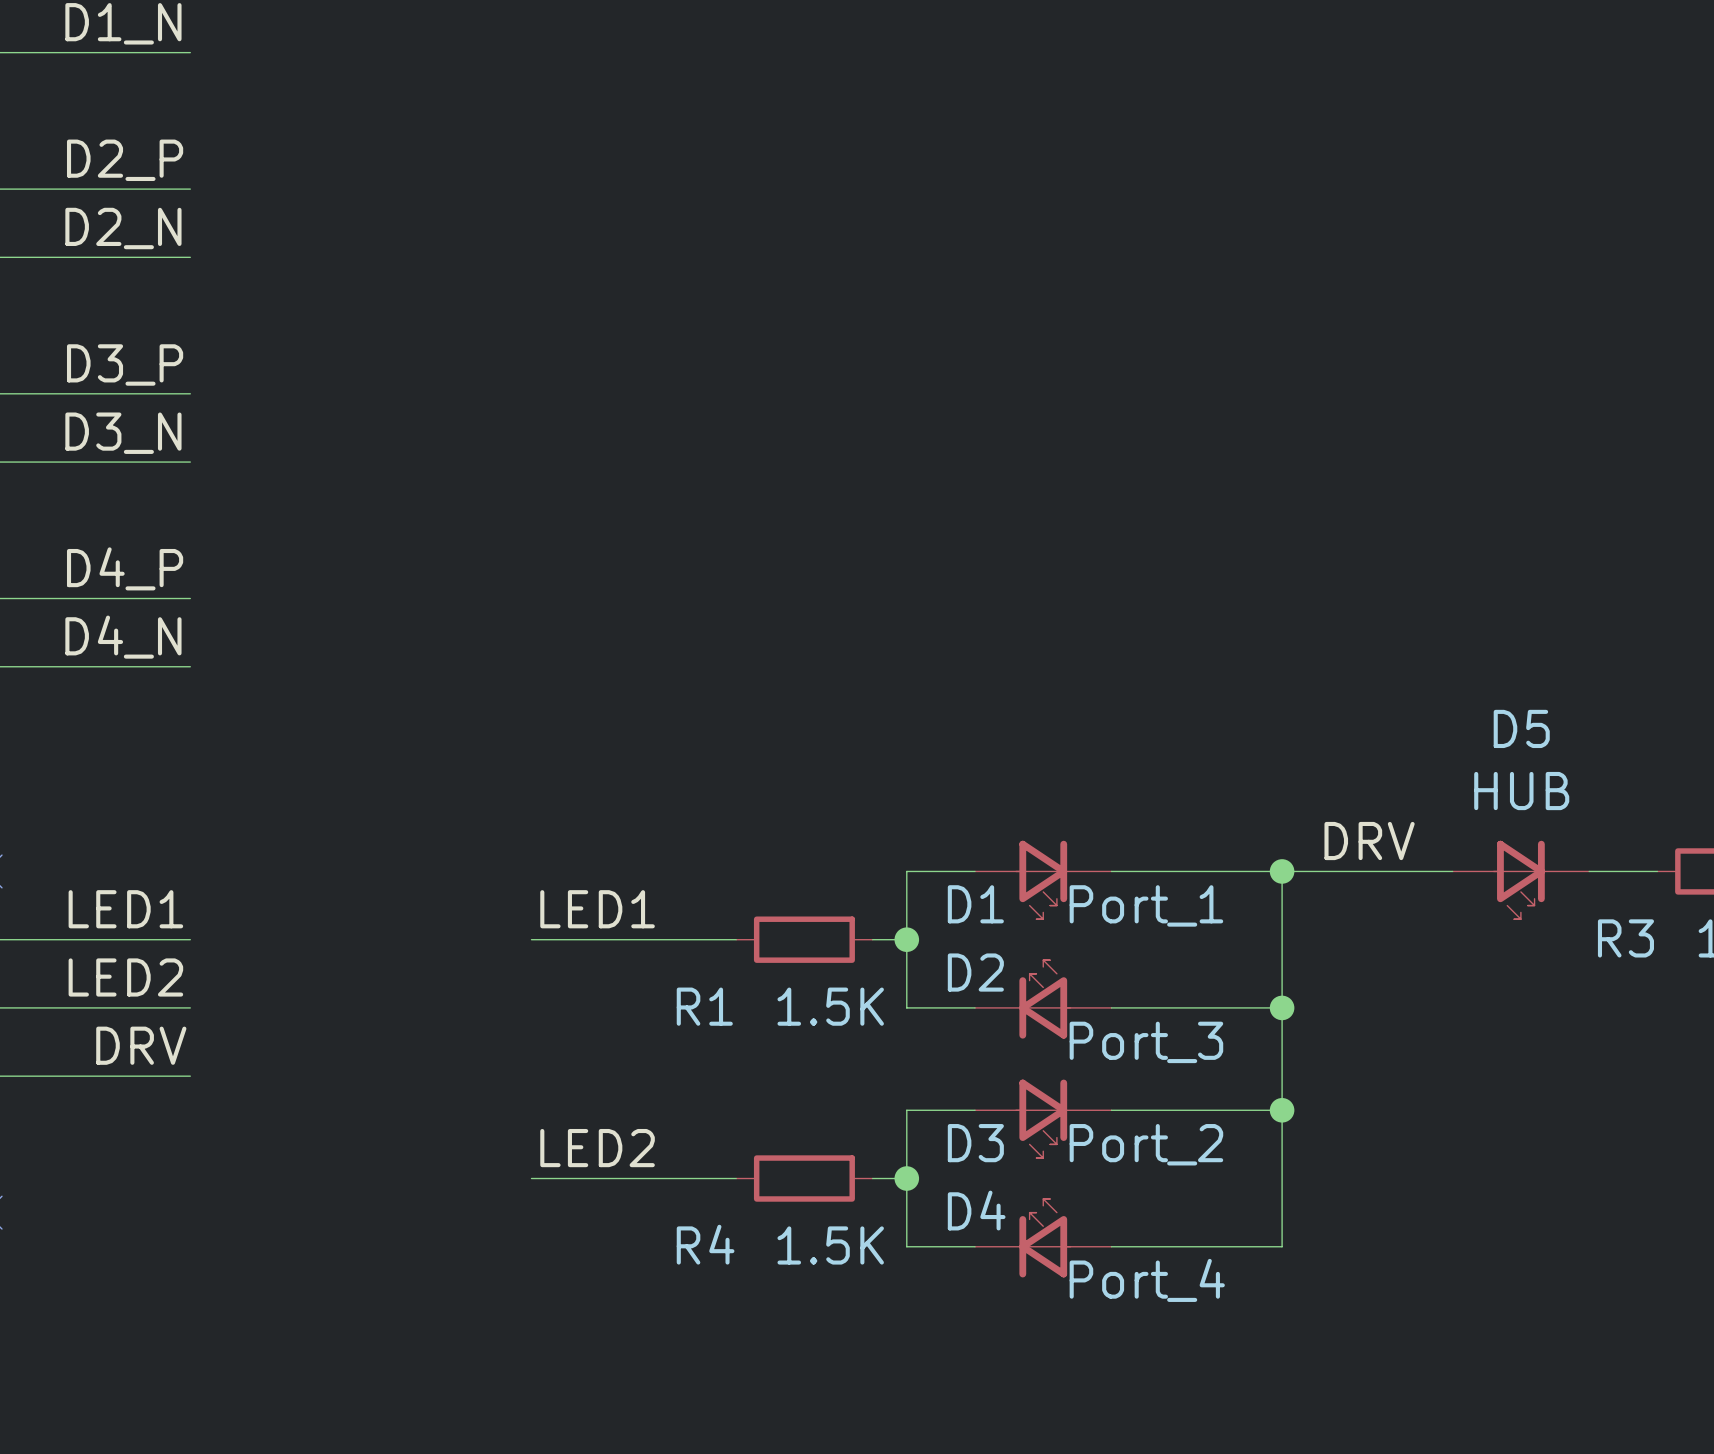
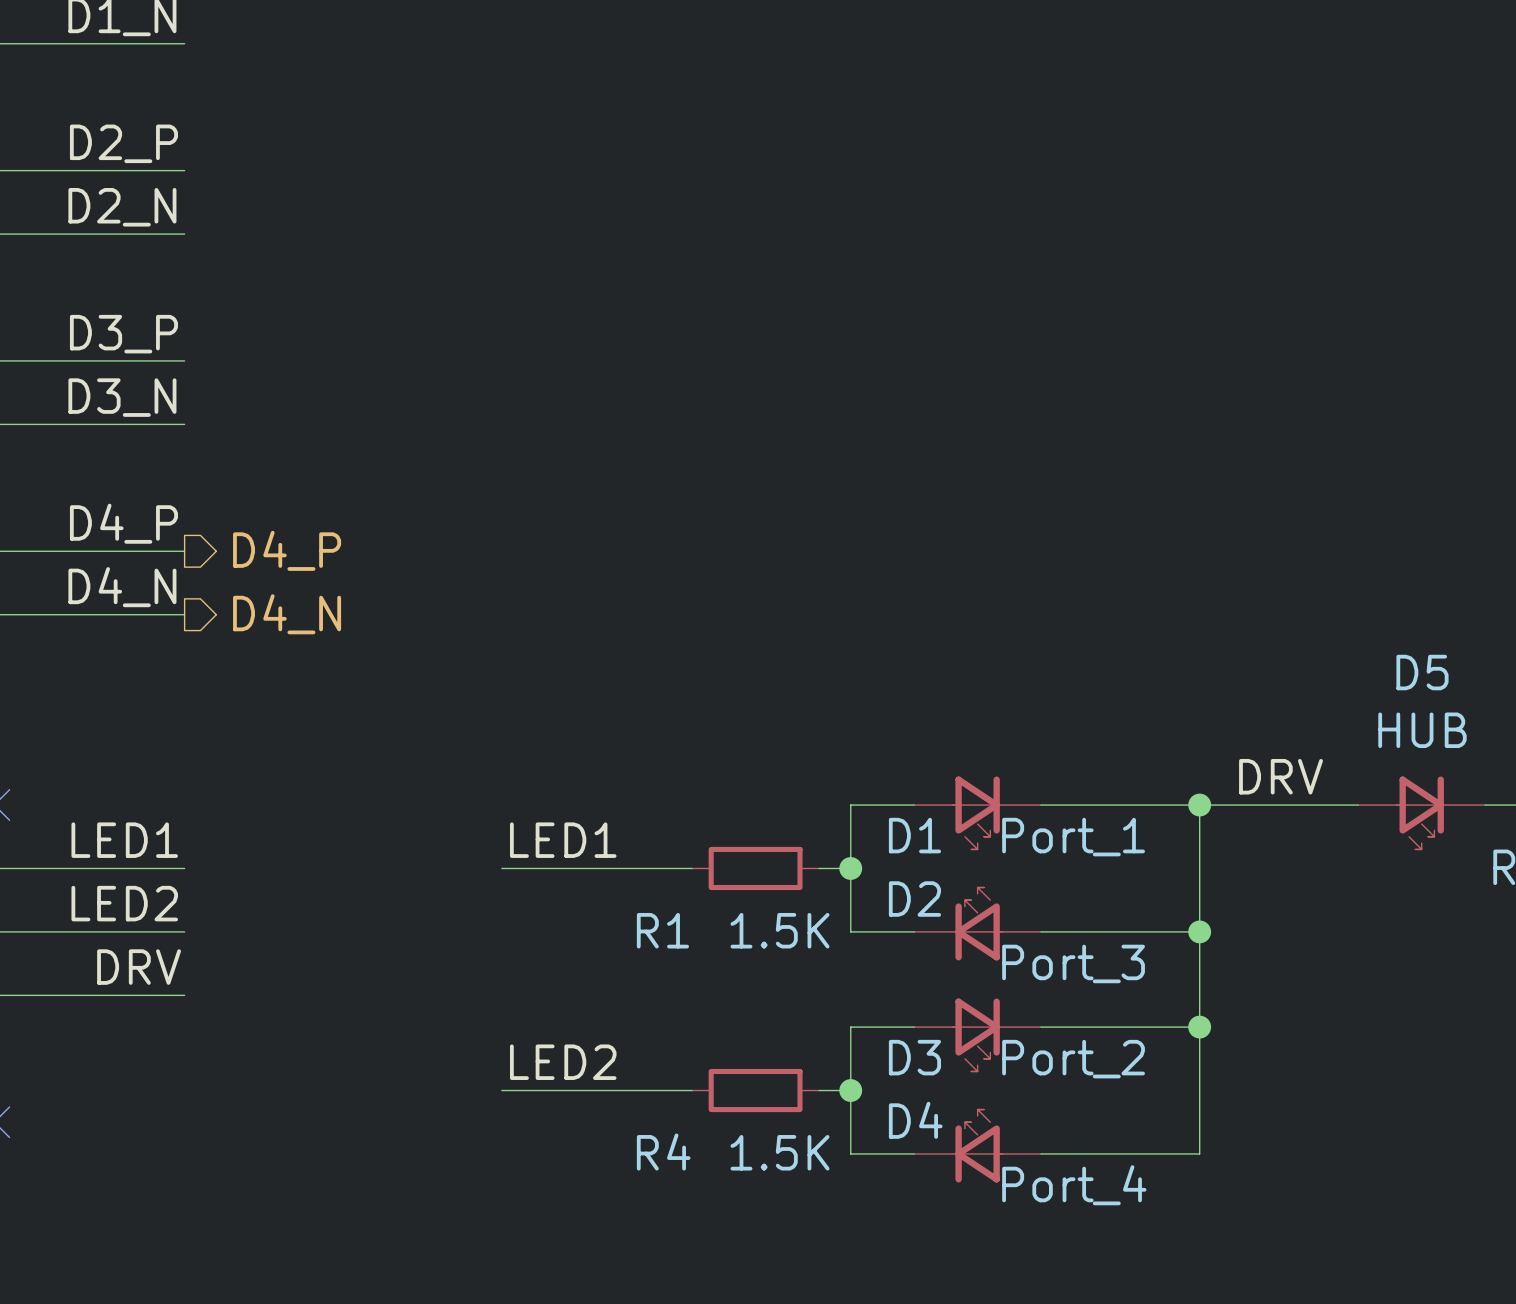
hierarchical label: none -> D4_P (287, 550)
hierarchical label: none -> D4_N (287, 614)

